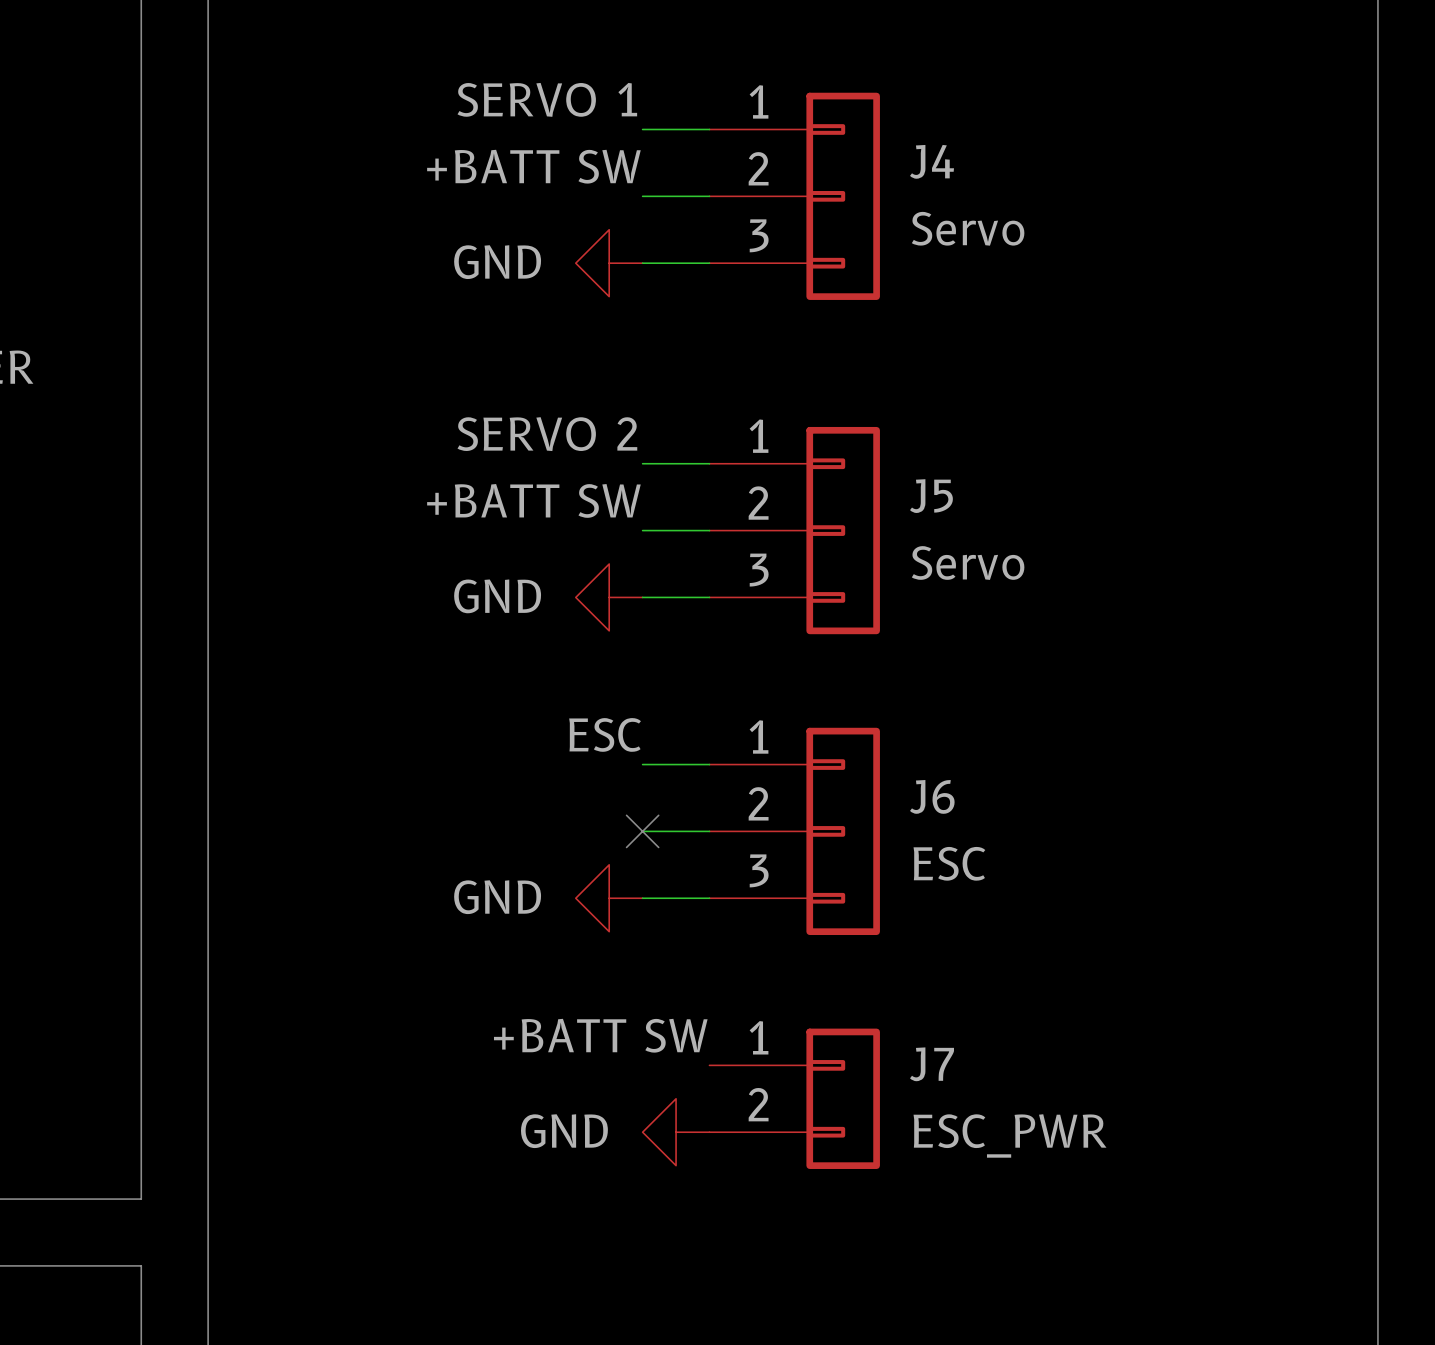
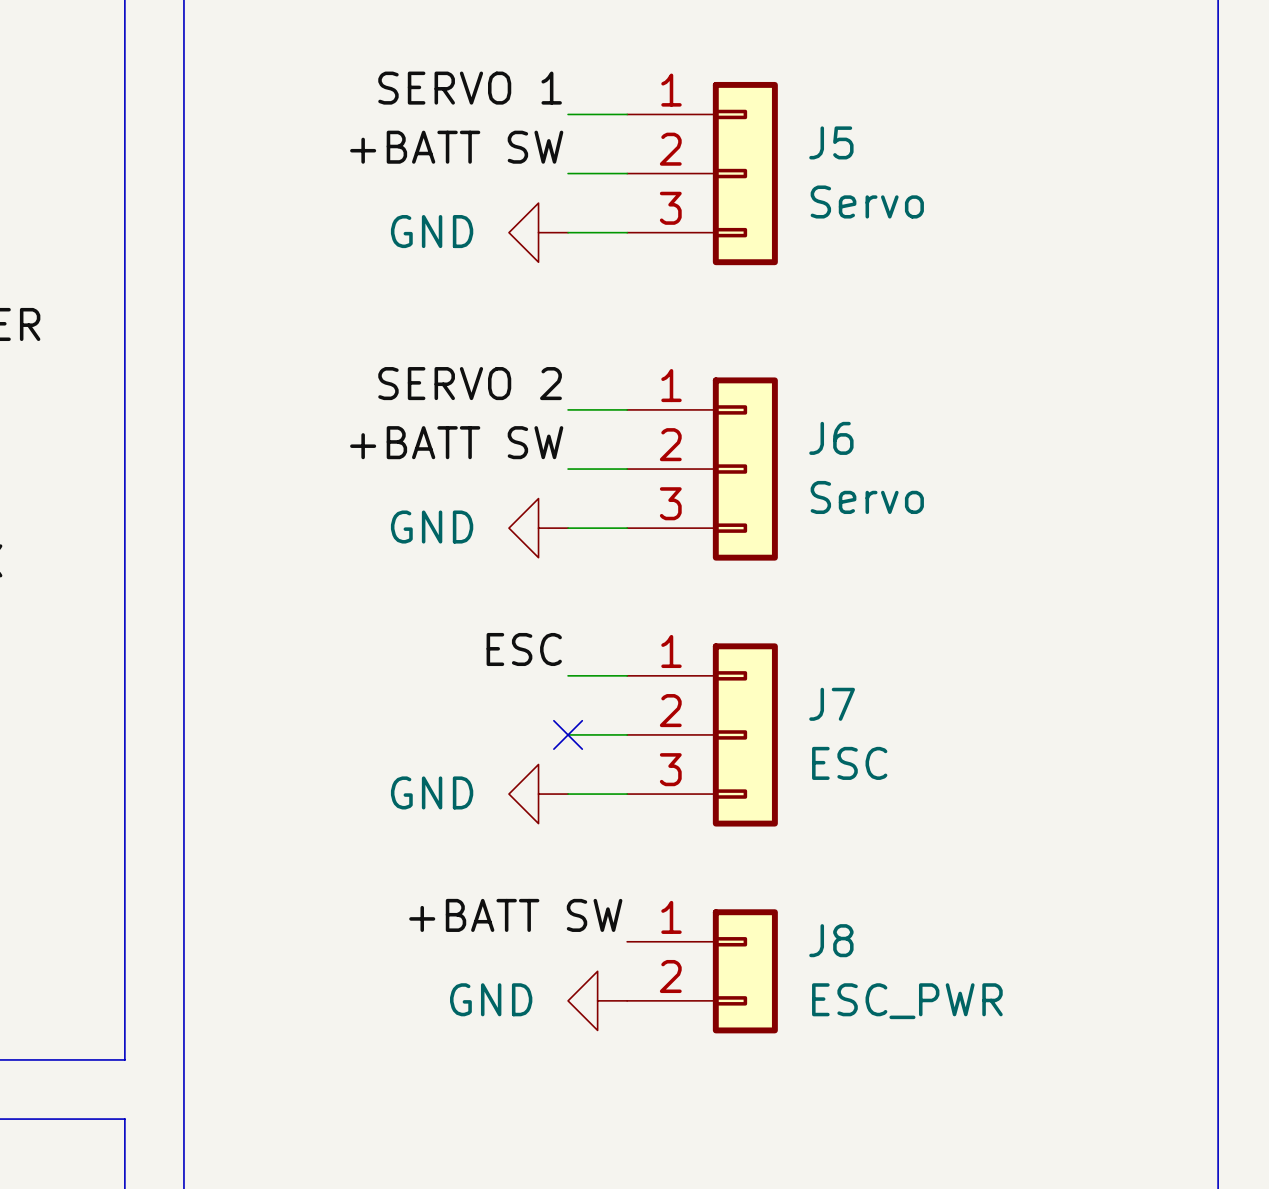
J4 name: J4 (932, 161) -> J5 (831, 142)
J5 name: J5 (931, 496) -> J6 (831, 438)
J6 name: J6 (932, 796) -> J7 (832, 704)
J7 name: J7 (932, 1064) -> J8 (831, 940)

